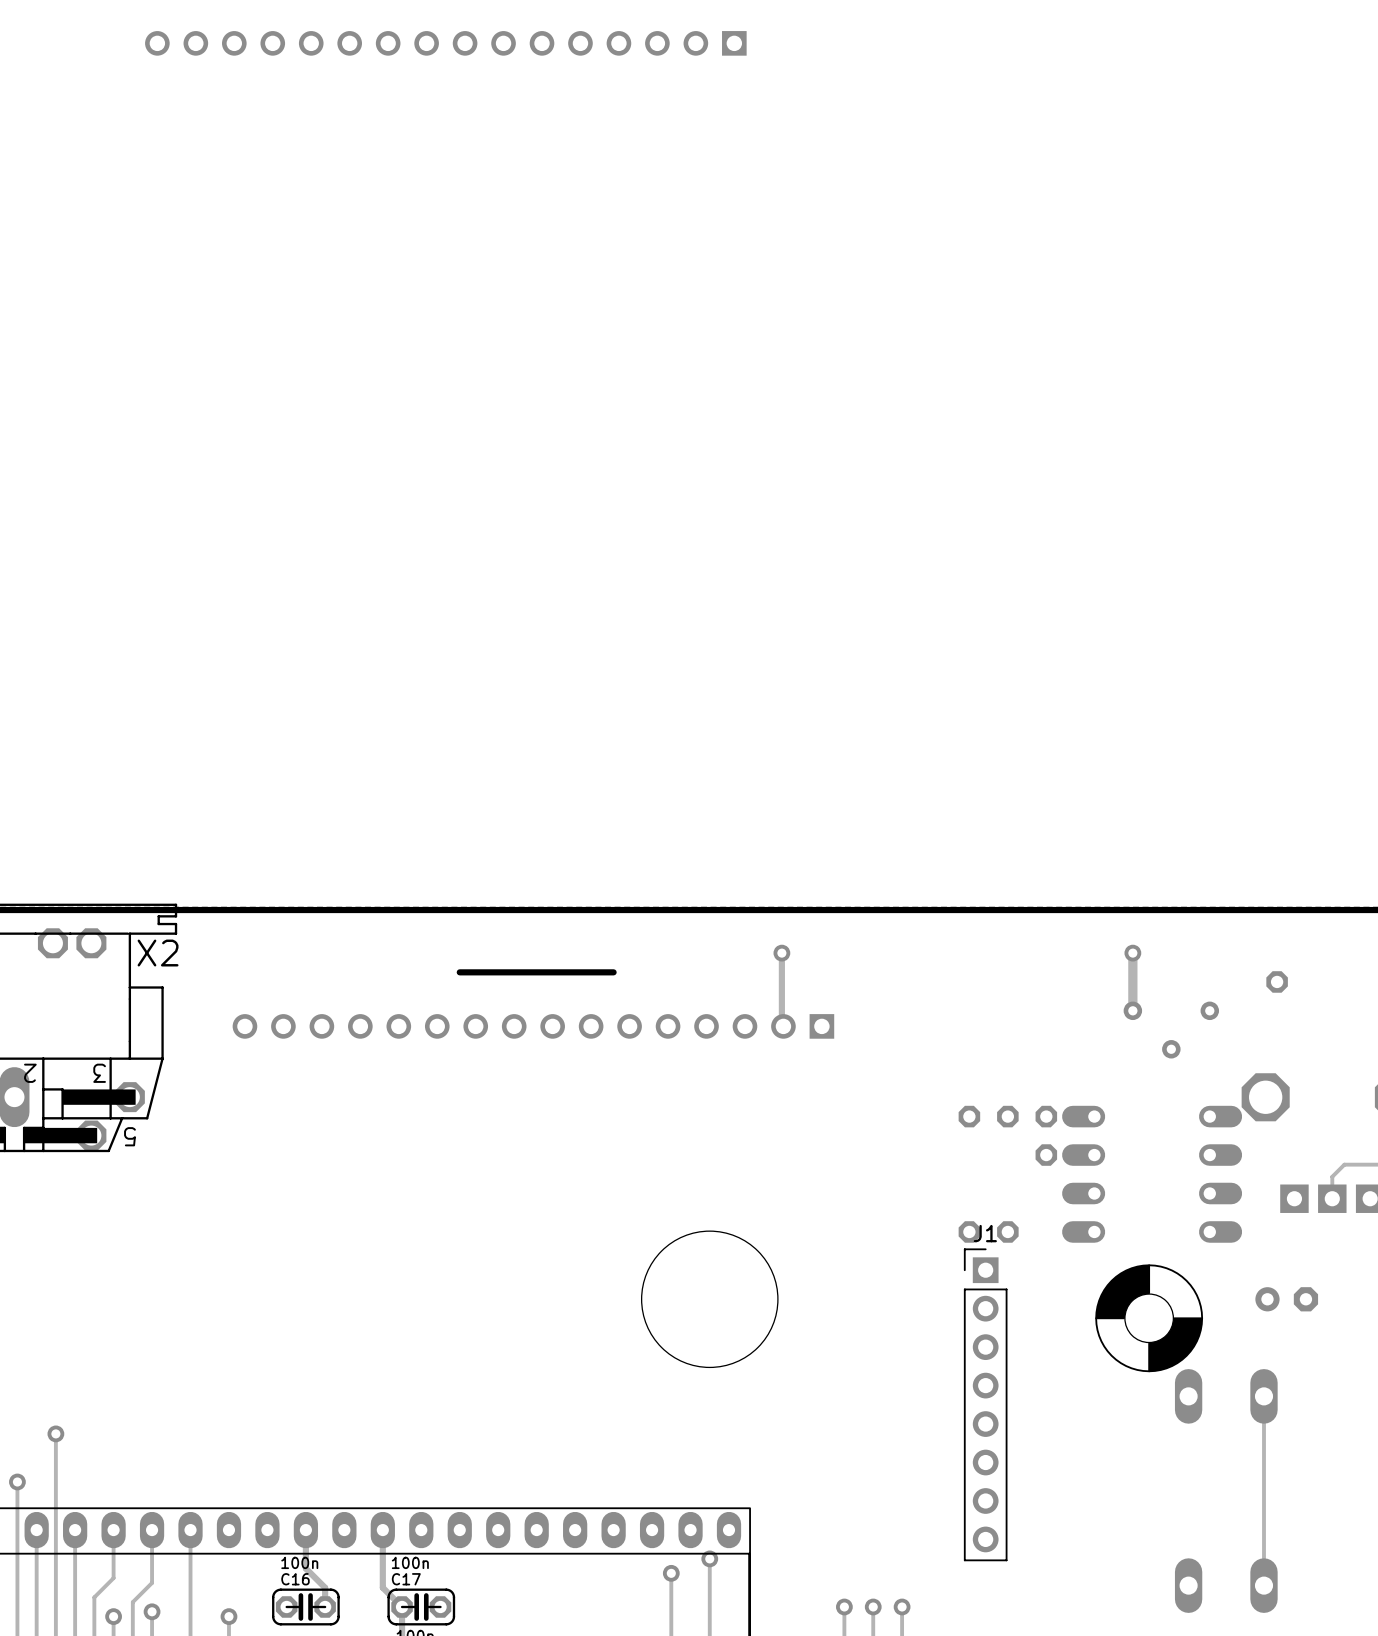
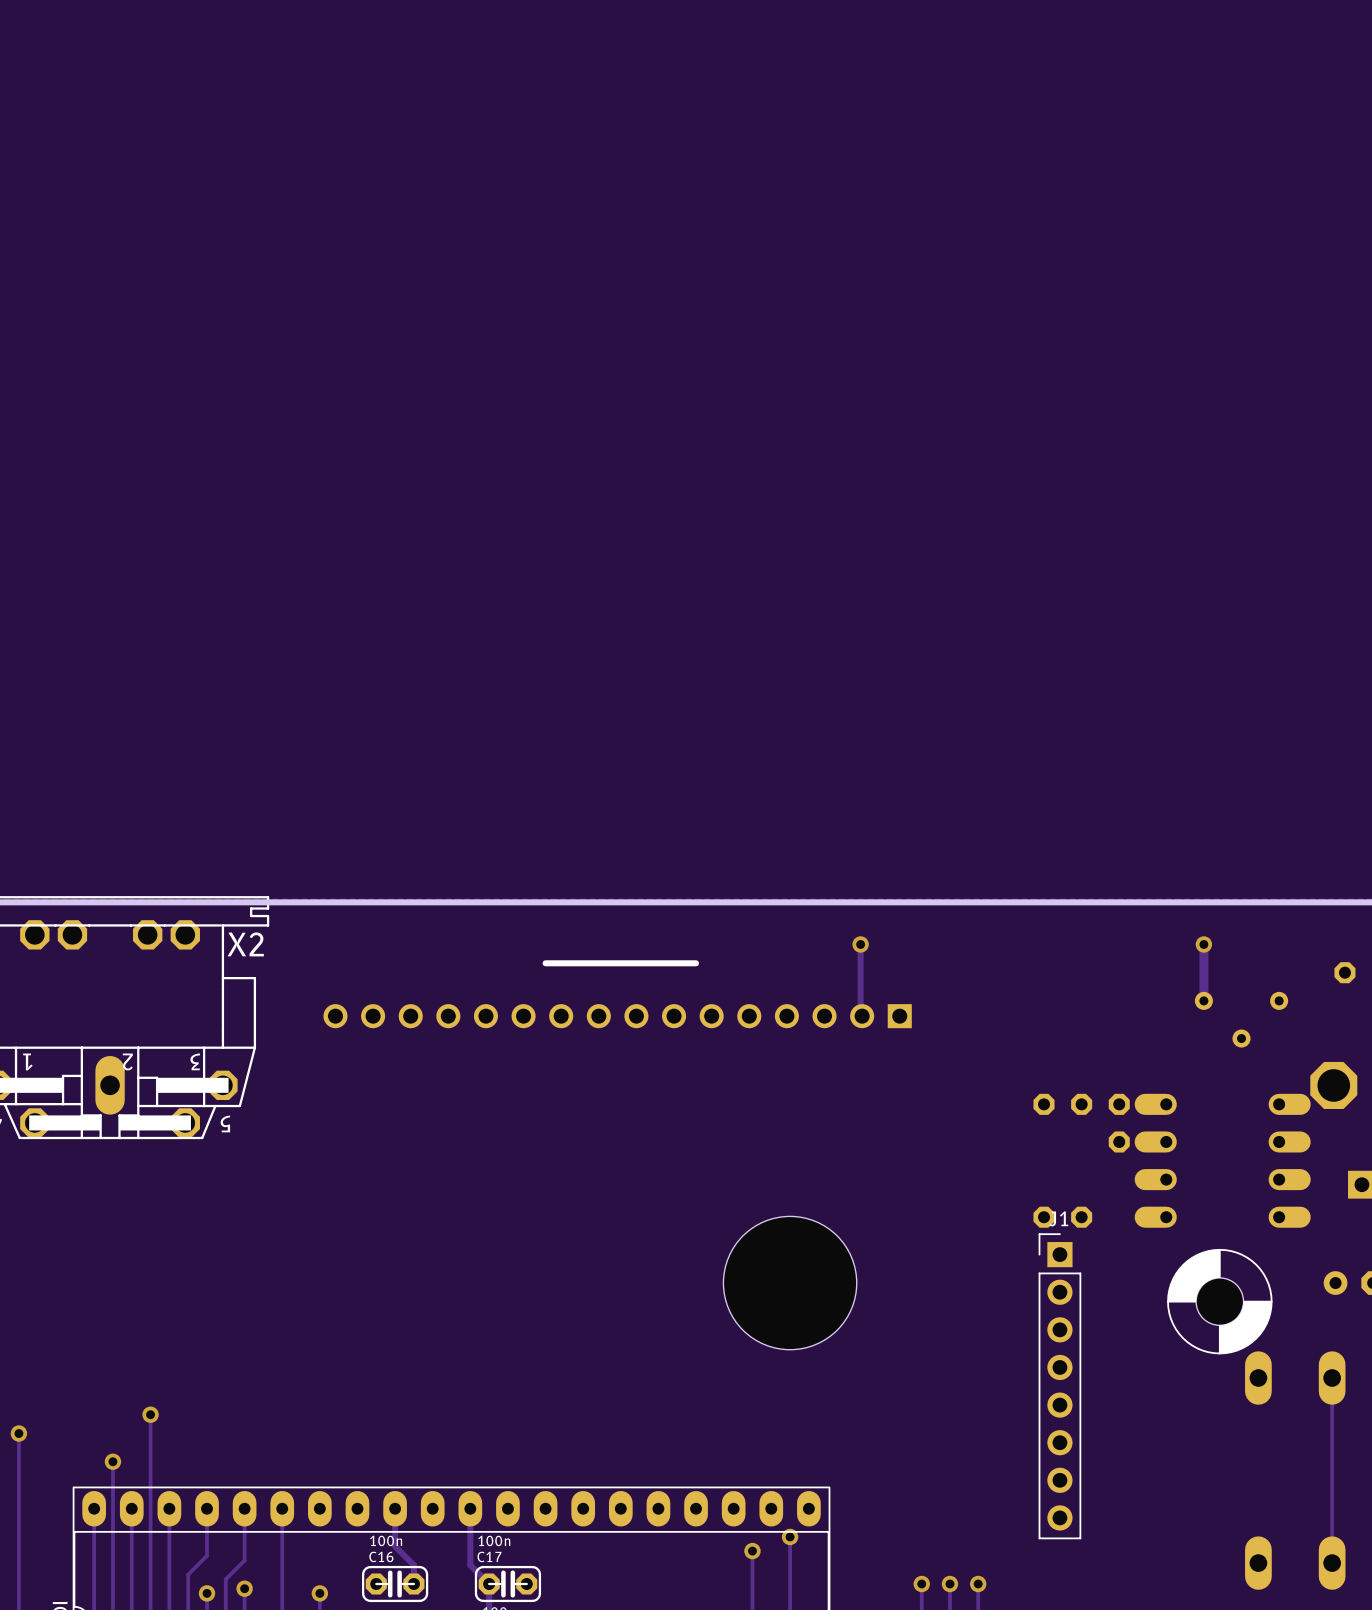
part: (445, 43) -> none

